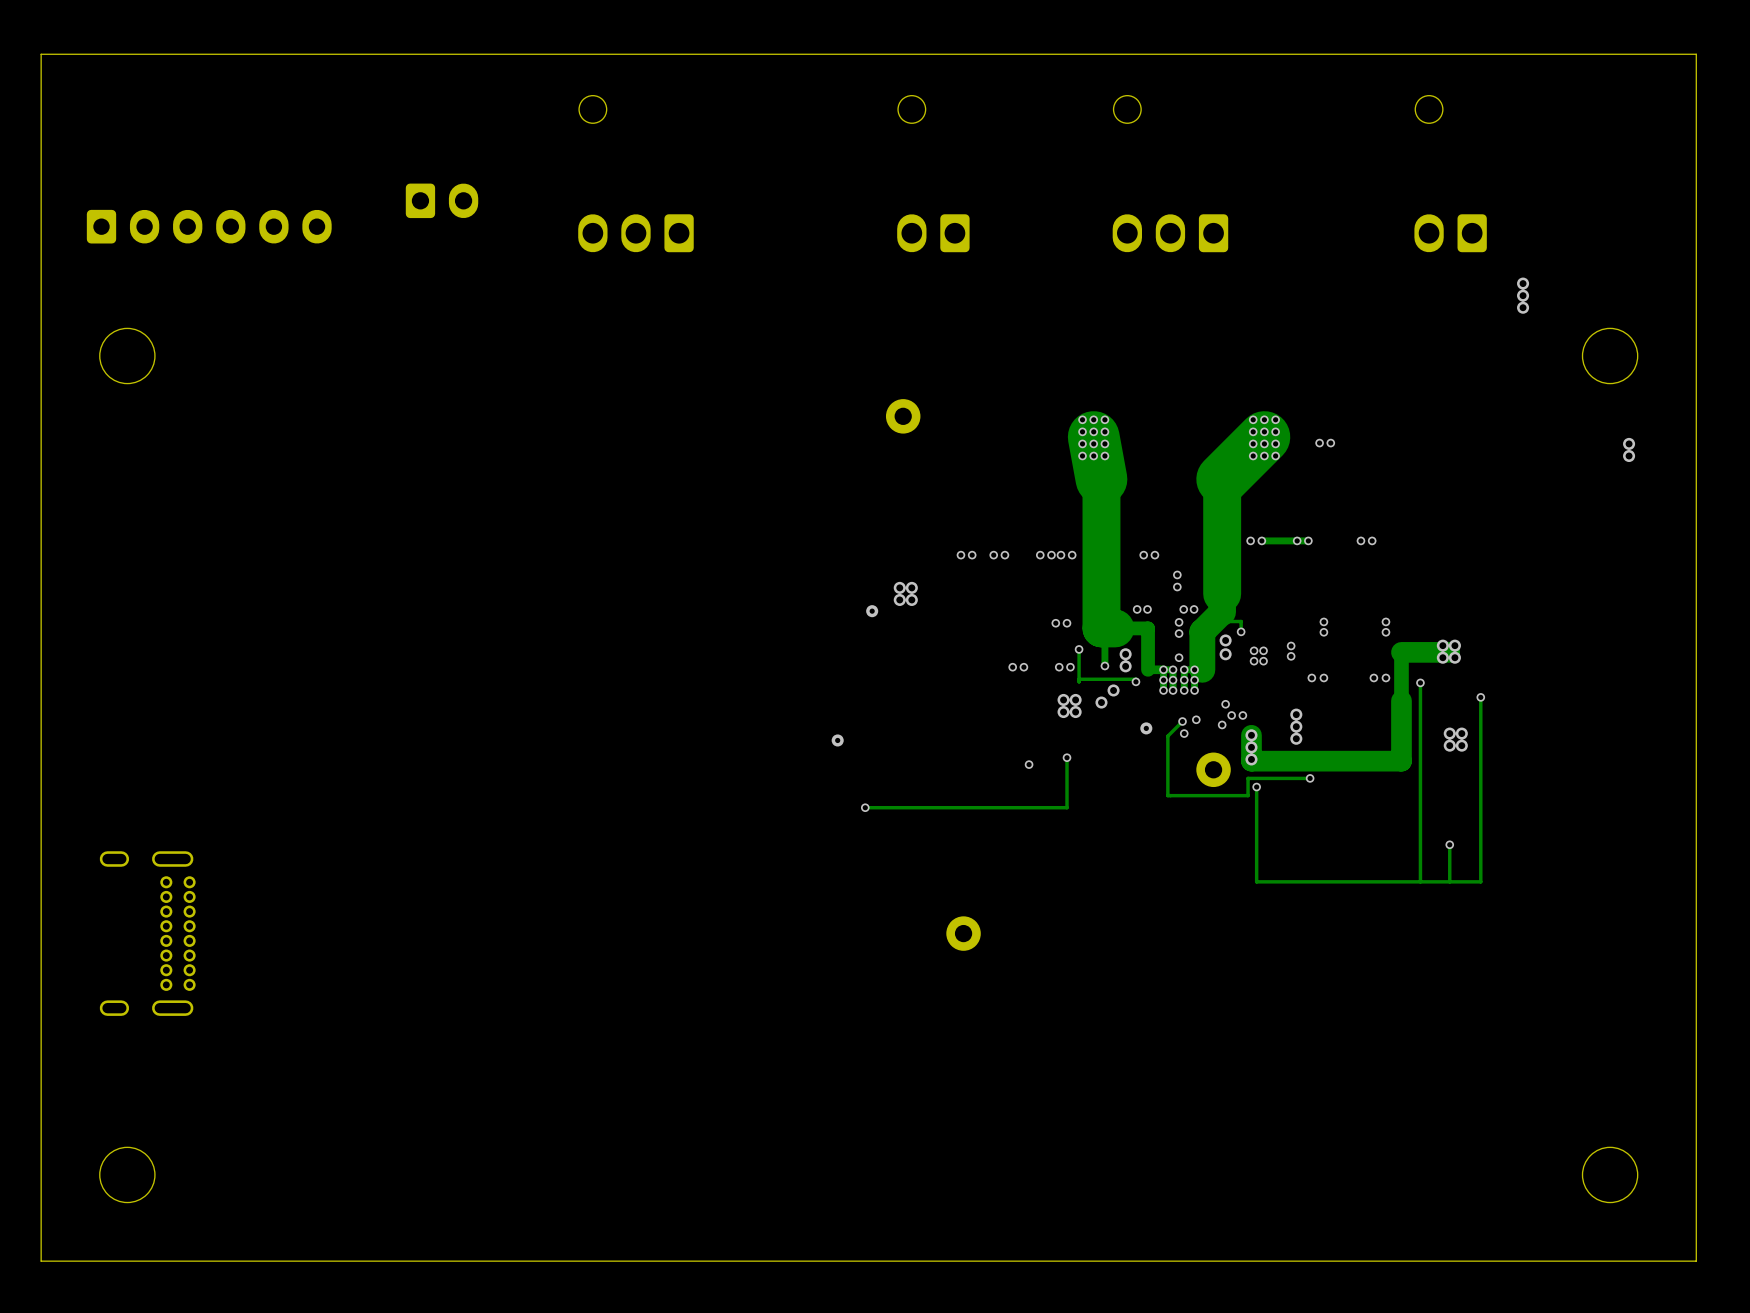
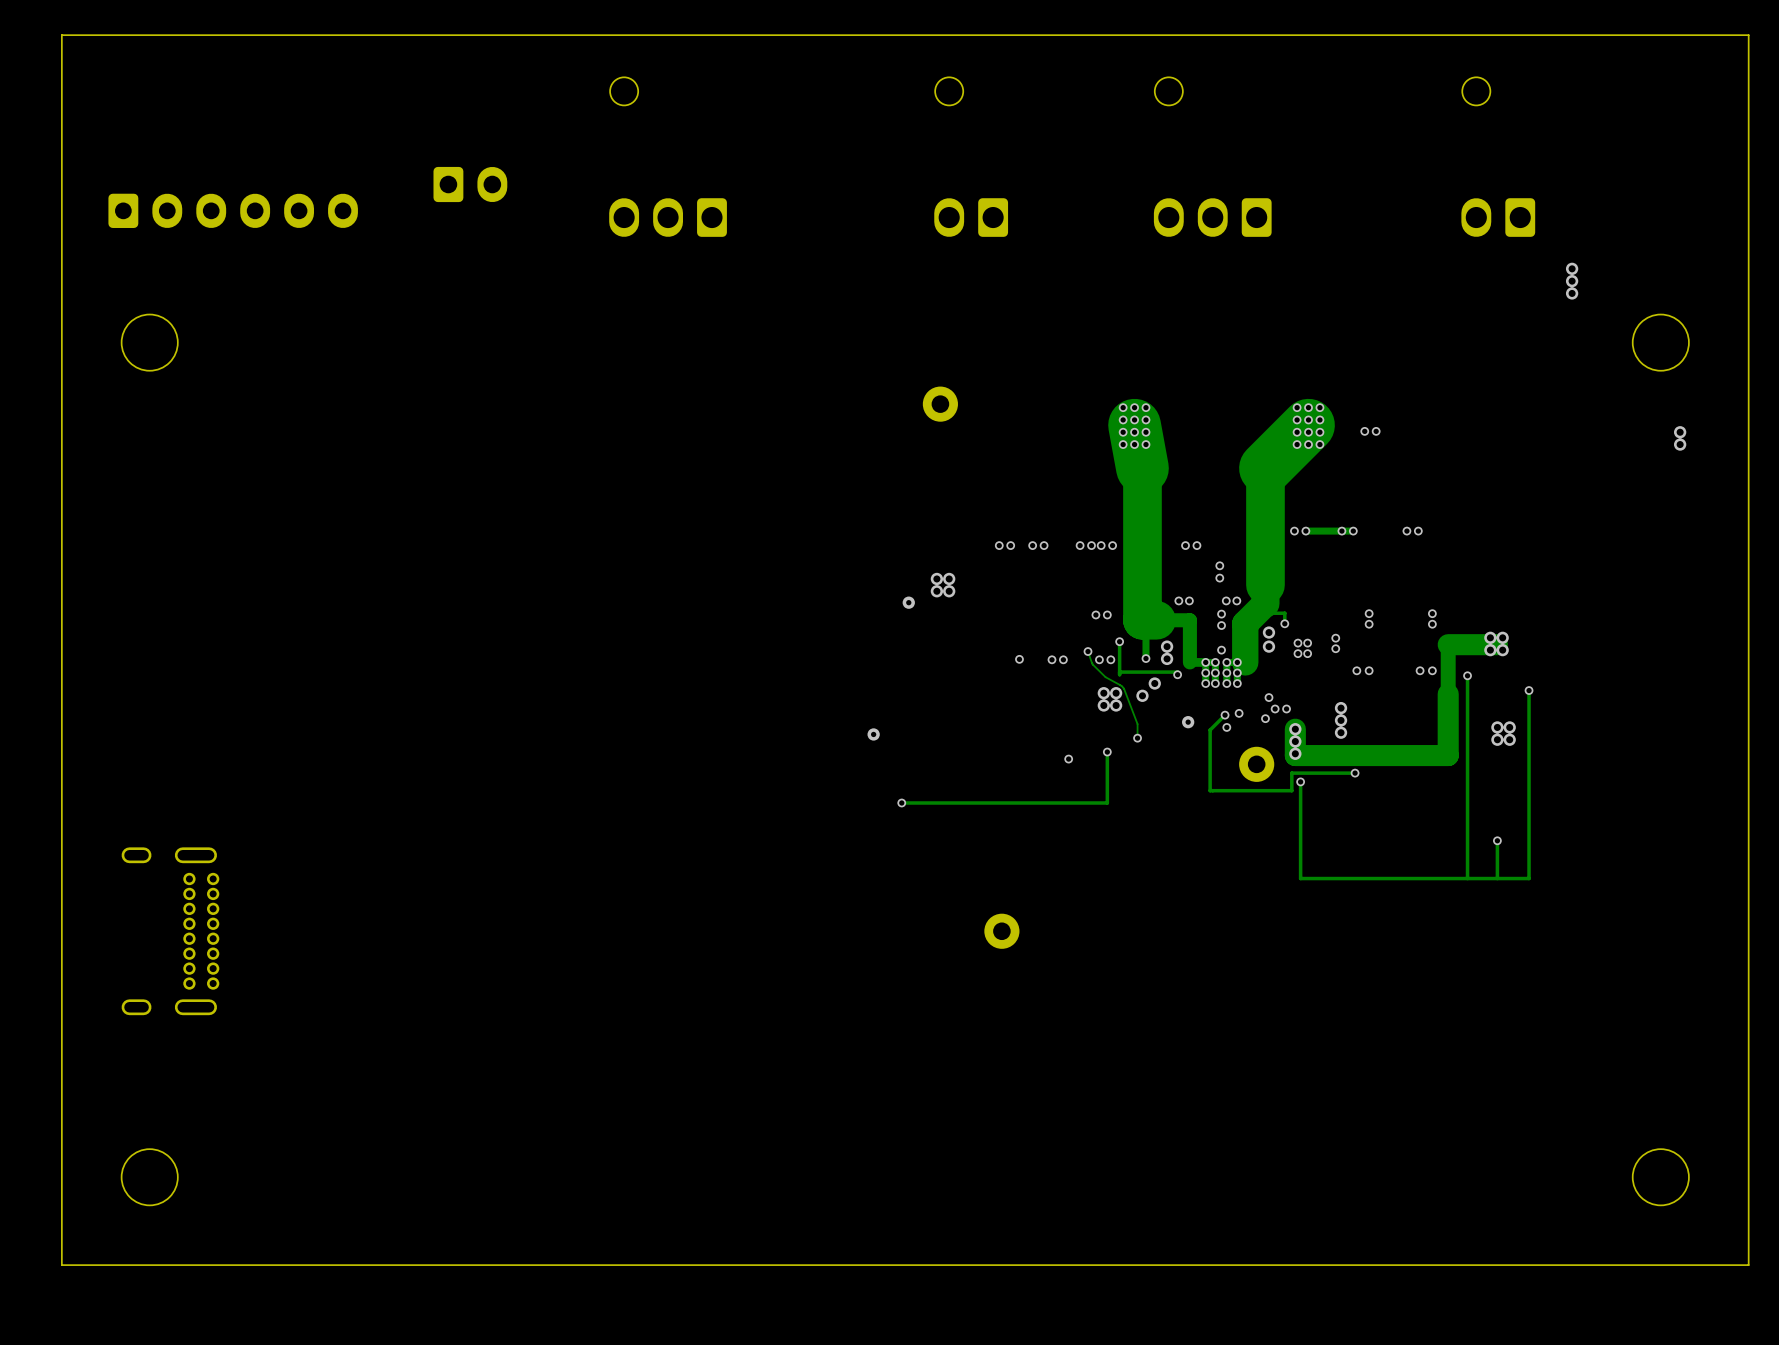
track: none -> (1088, 651) (1092, 664) (1105, 677) (1124, 689) (1137, 724) (1137, 738)
via: none -> (1088, 651)
via: none -> (1019, 659)
via: none -> (1137, 738)

